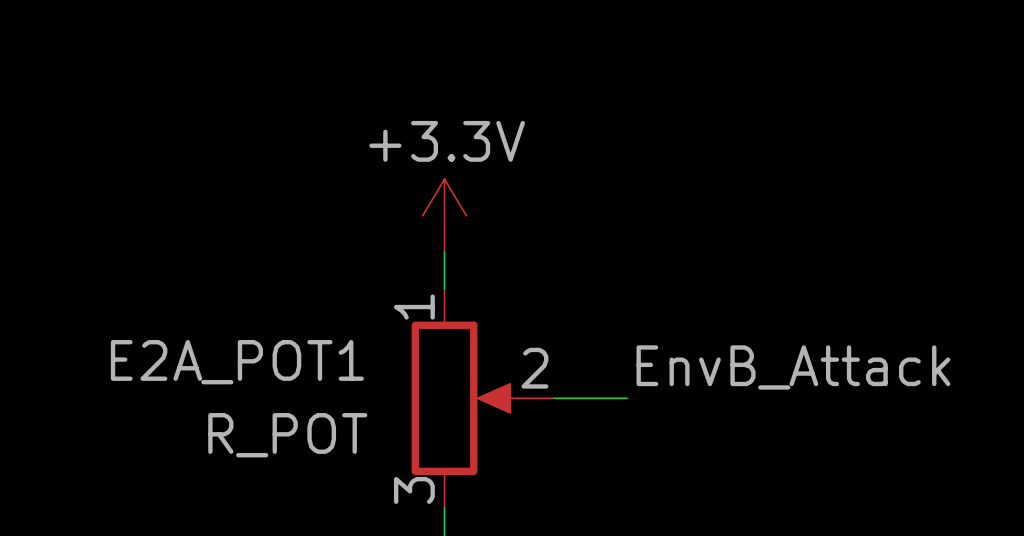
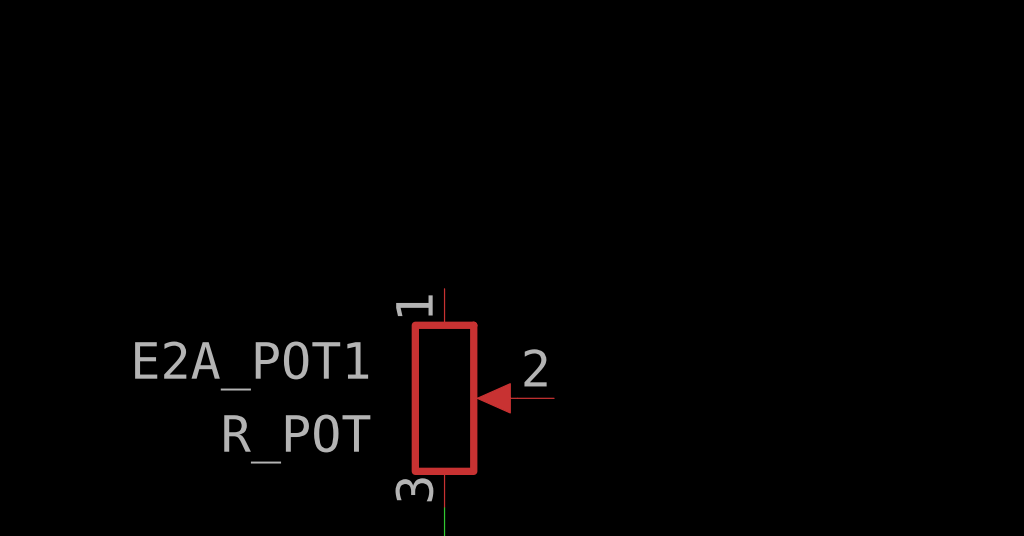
power symbol: +3.3V (444, 215) -> none
wire: (444, 252) (444, 288) -> none
label: EnvB_Attack (793, 367) -> none
wire: (554, 398) (627, 398) -> none

